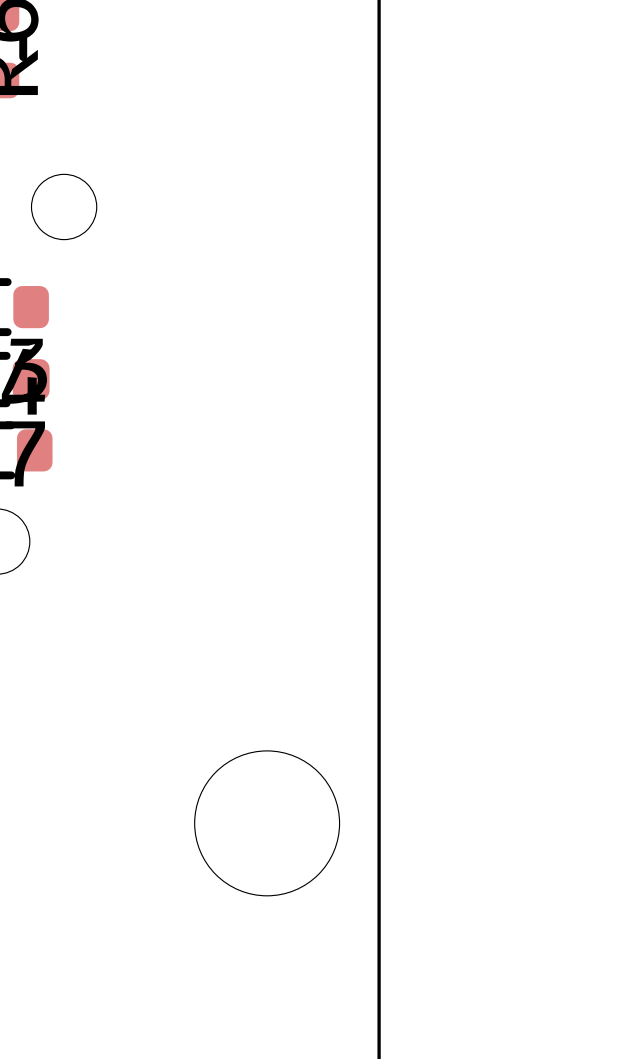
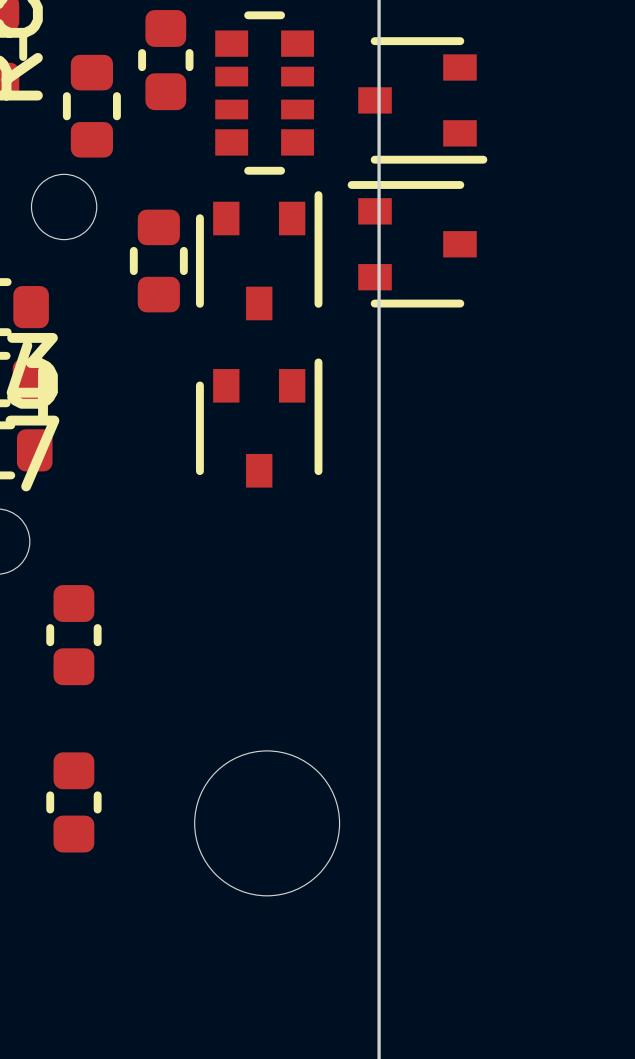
part: none -> (165, 60)
part: none -> (264, 93)
part: none -> (422, 100)
part: none -> (91, 106)
part: none -> (412, 244)
part: none -> (259, 255)
part: none -> (158, 261)
part: none -> (259, 423)
part: none -> (73, 635)
part: none -> (73, 802)

